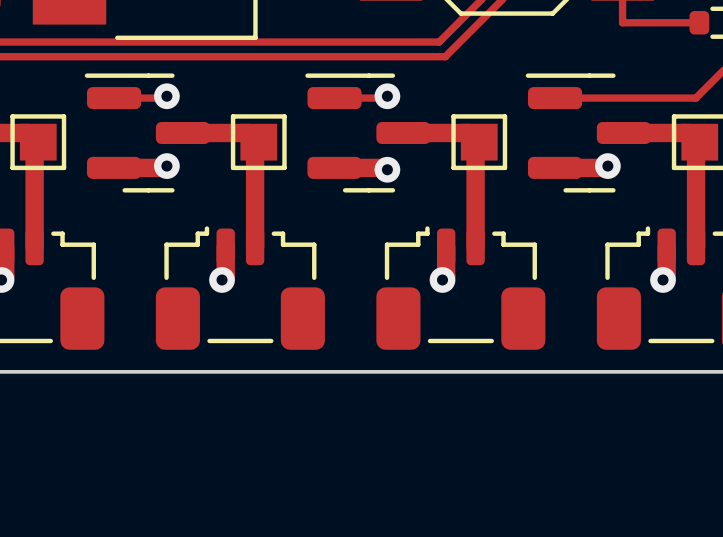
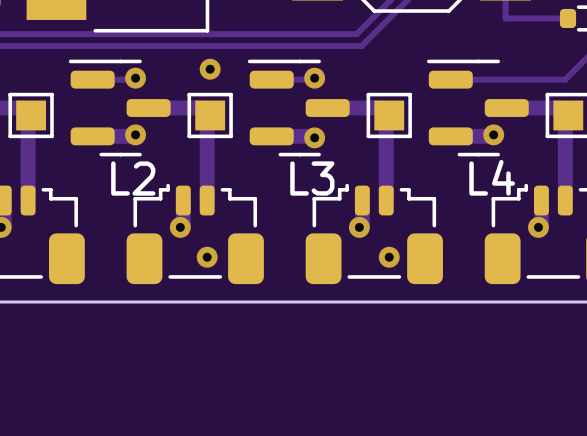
via: none -> (210, 69)
part text: none -> L4 (492, 177)
part text: none -> L2 (133, 178)
part text: none -> L3 (312, 178)
via: none -> (207, 257)
via: none -> (389, 257)

